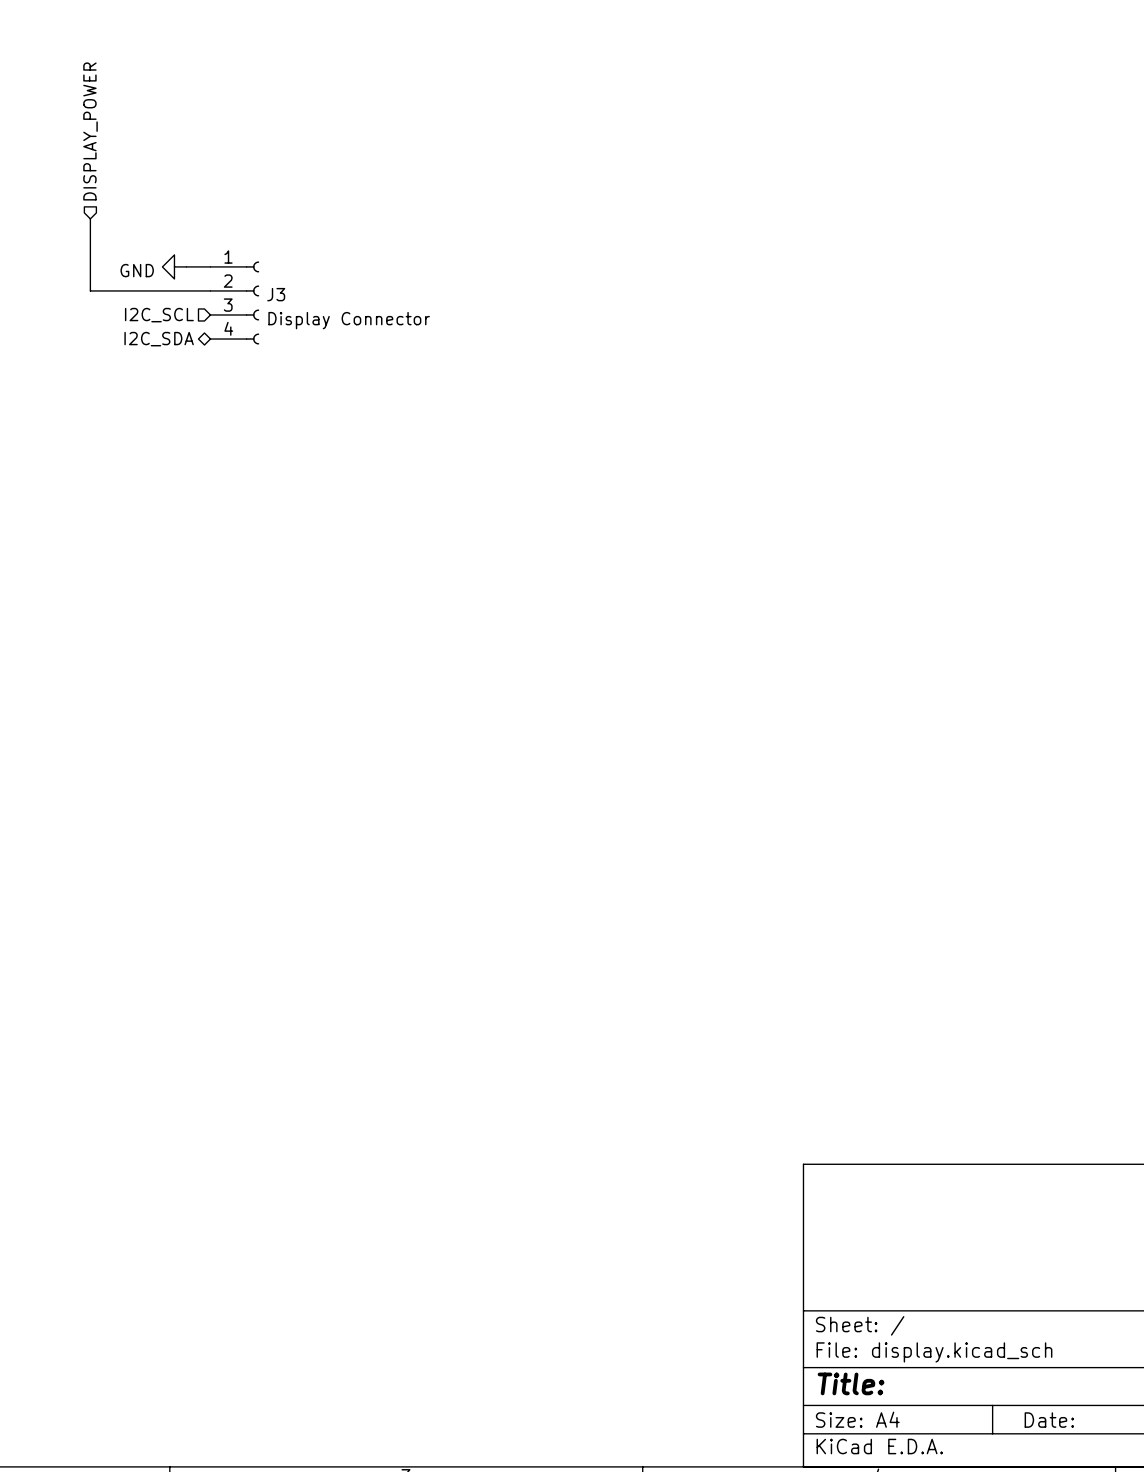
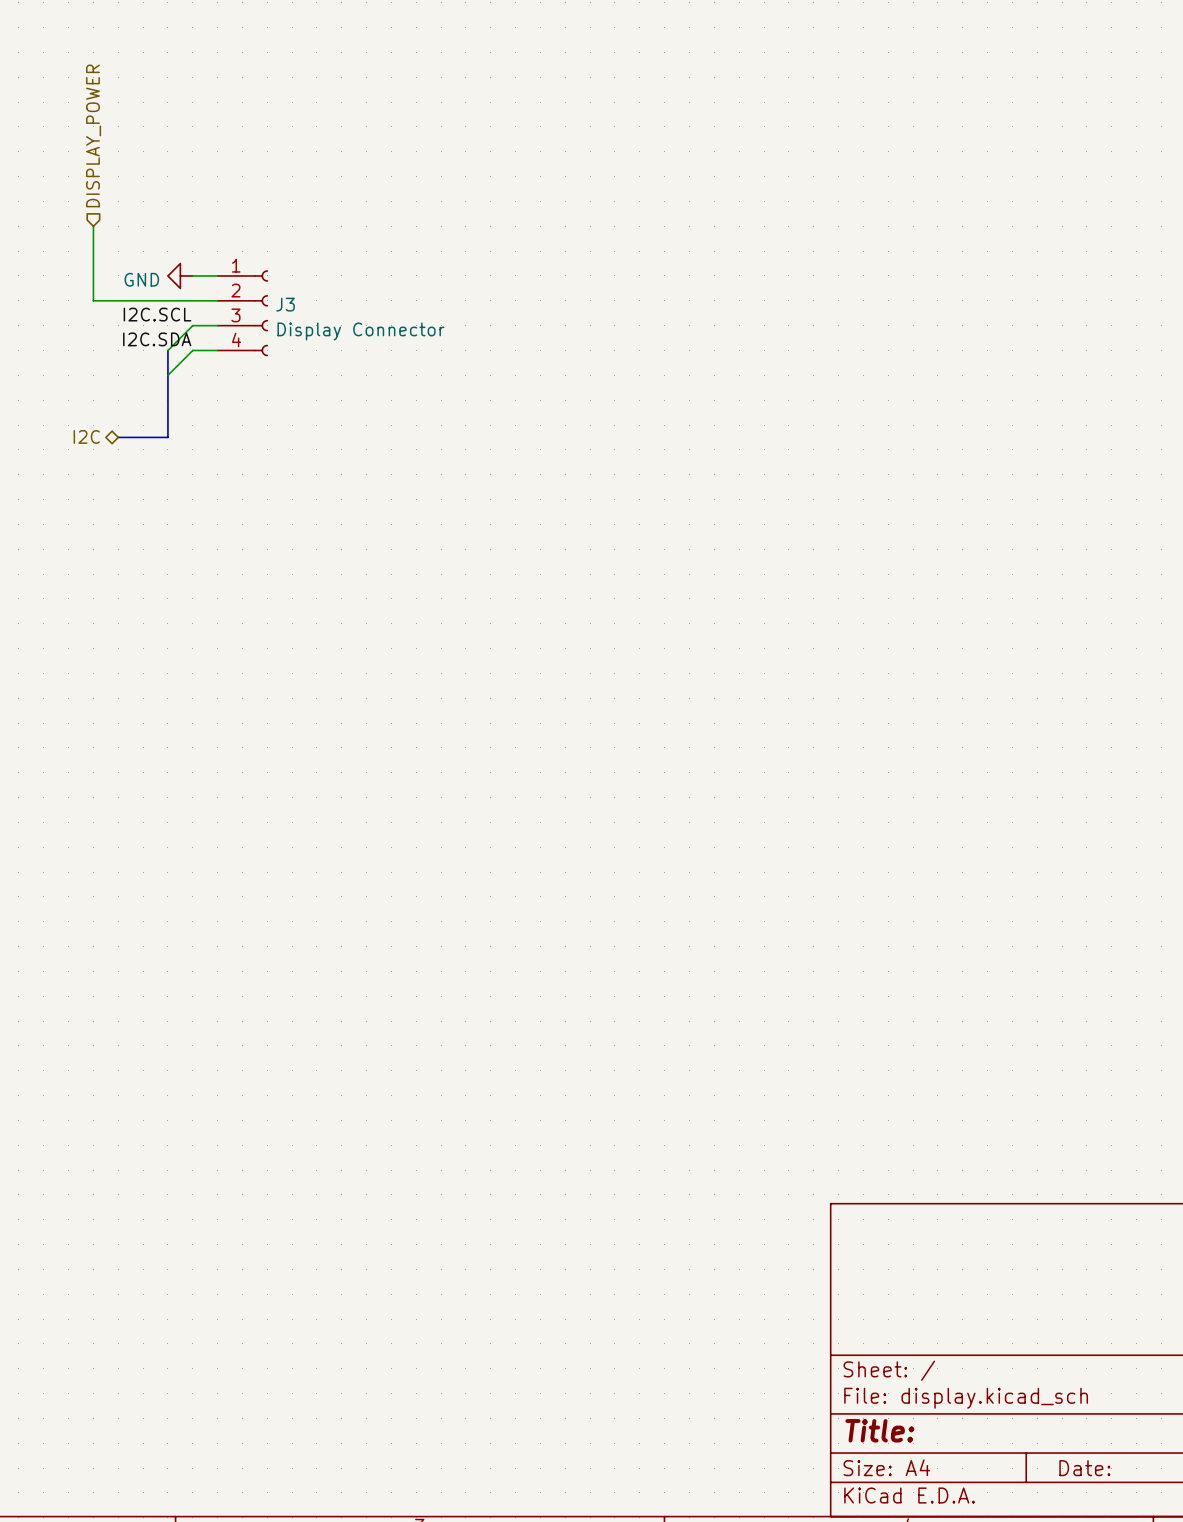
label: none -> I2C.SCL (157, 314)
wire: none -> (217, 325) (192, 325) (167, 350)
hierarchical label: I2C_SCL (159, 315) -> none
label: none -> I2C.SDA (157, 339)
hierarchical label: I2C_SDA (159, 339) -> none
bus: none -> (167, 350) (167, 437) (118, 437)
wire: none -> (217, 350) (192, 350) (167, 375)
hierarchical label: none -> I2C (86, 436)

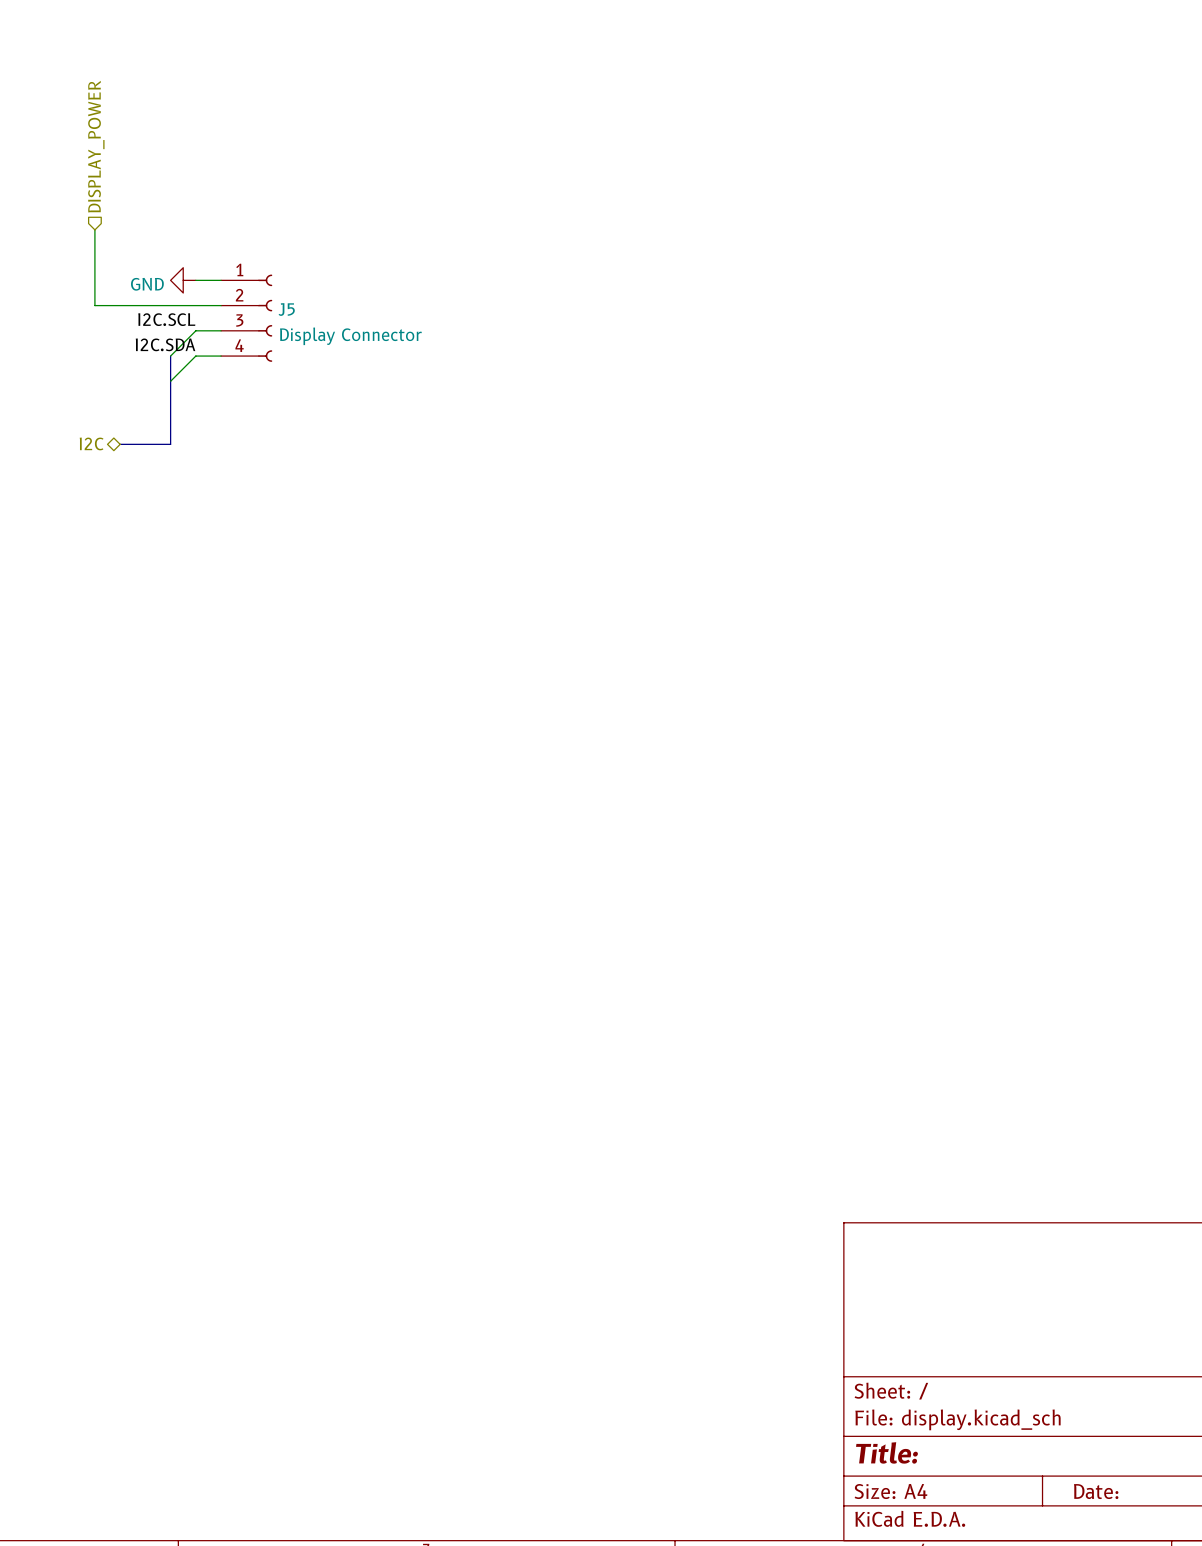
J3 name: J3 (285, 304) -> J5 (286, 309)

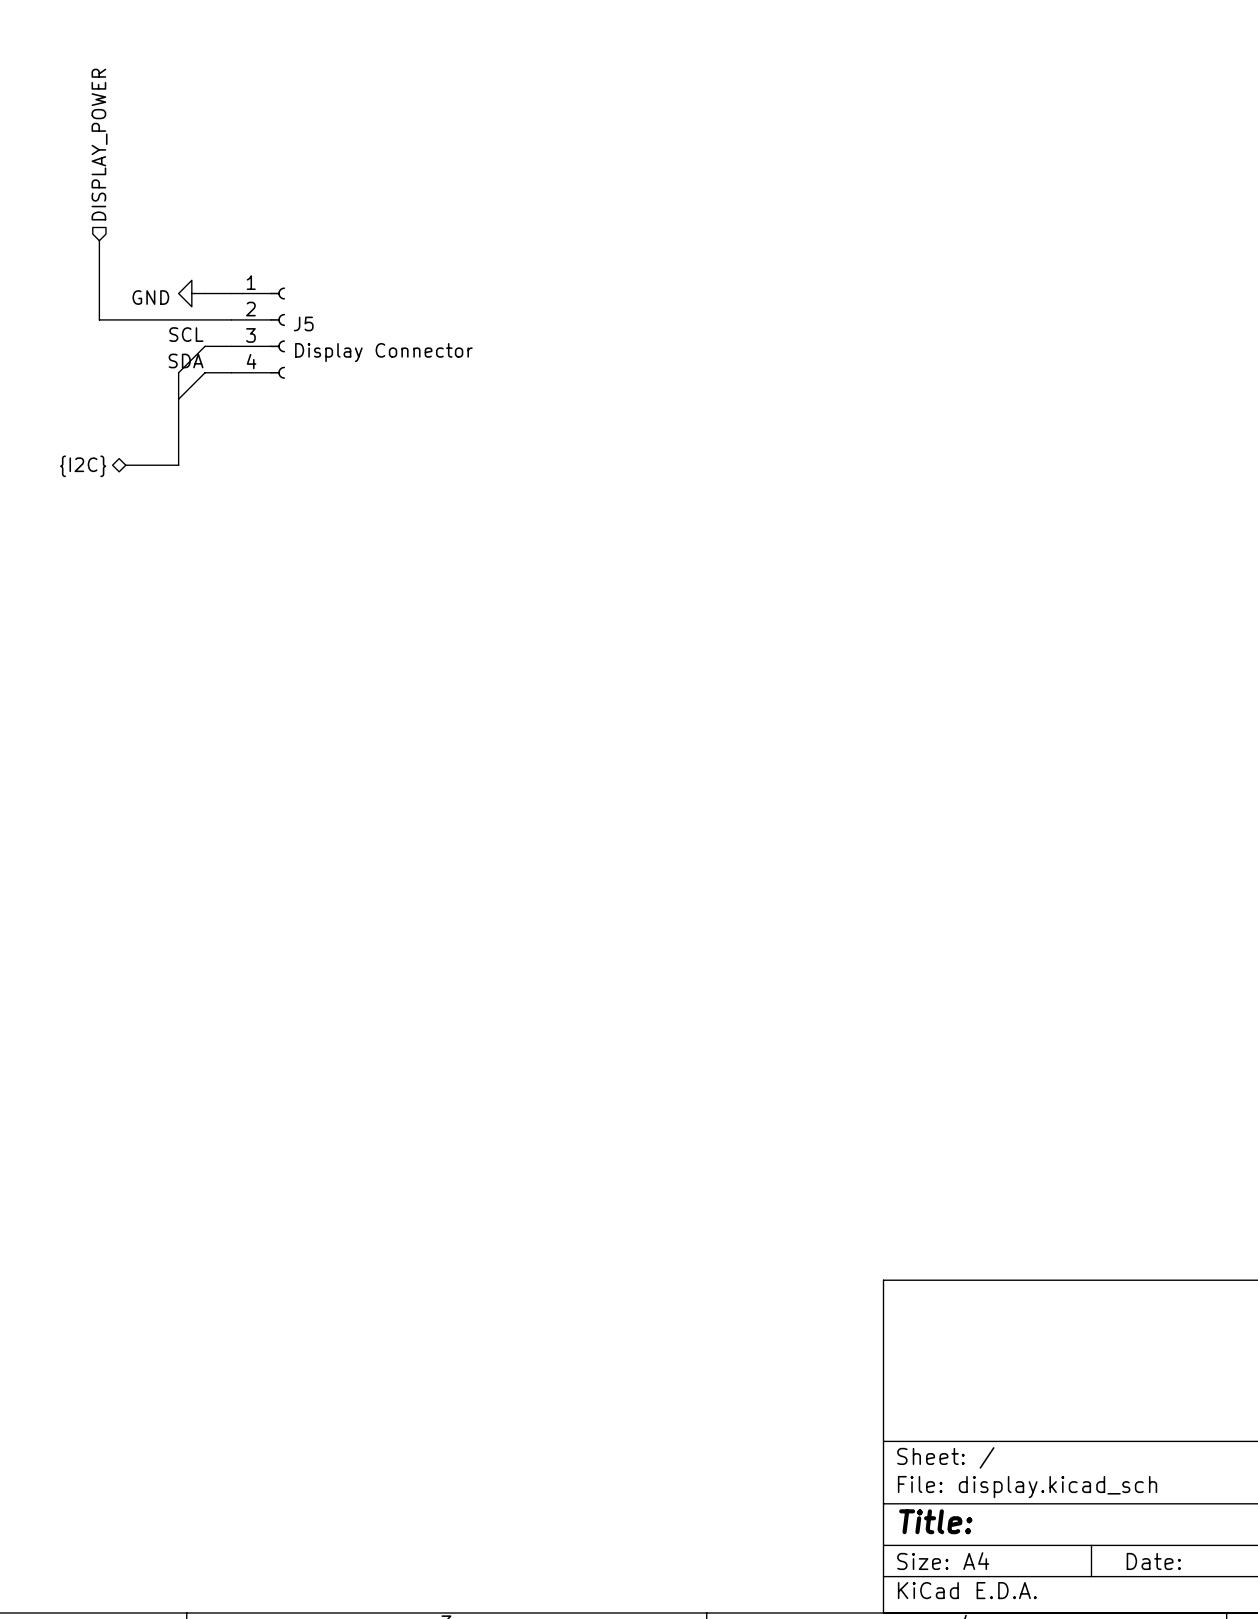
label: I2C.SCL (166, 319) -> SCL (186, 334)
label: I2C.SDA (165, 344) -> SDA (186, 360)
hierarchical label: I2C (91, 443) -> {I2C} (83, 466)

